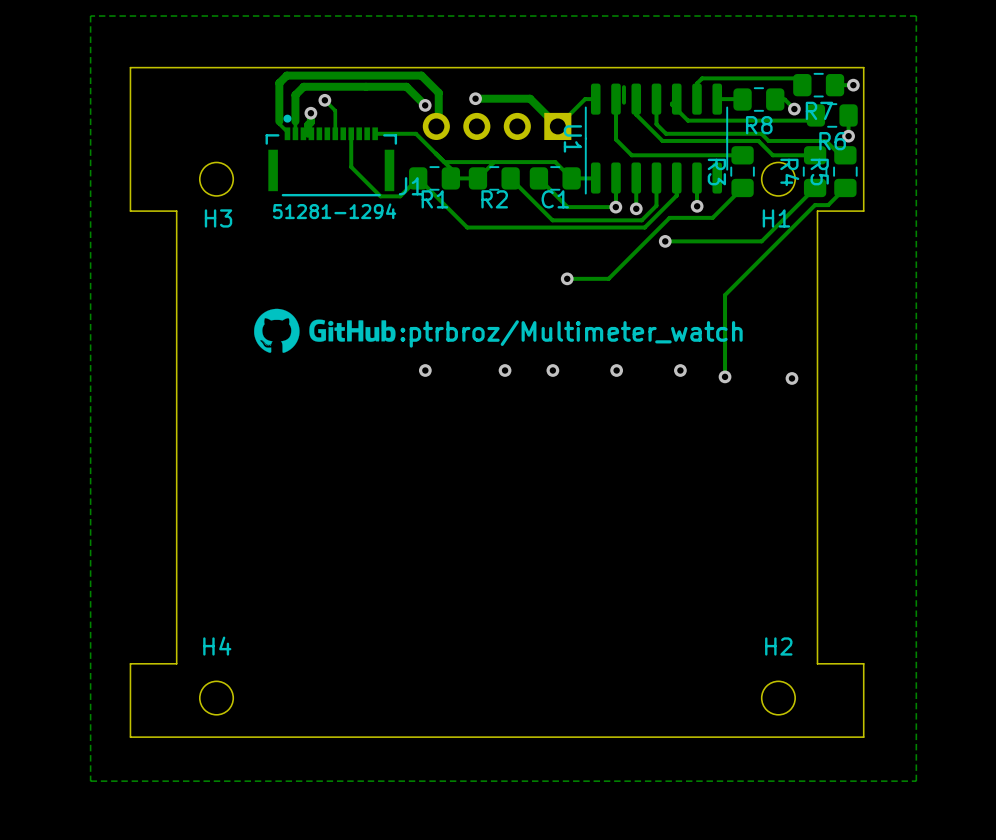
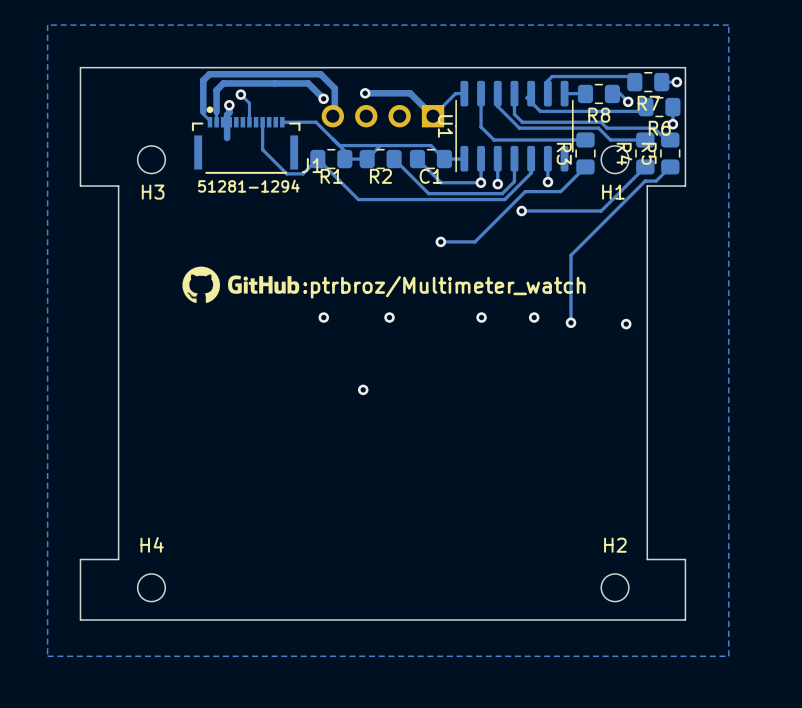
track: (623, 87) (623, 102) -> none
track: none -> (227, 122) (227, 138)
via: (552, 370) -> none
via: none -> (363, 389)

